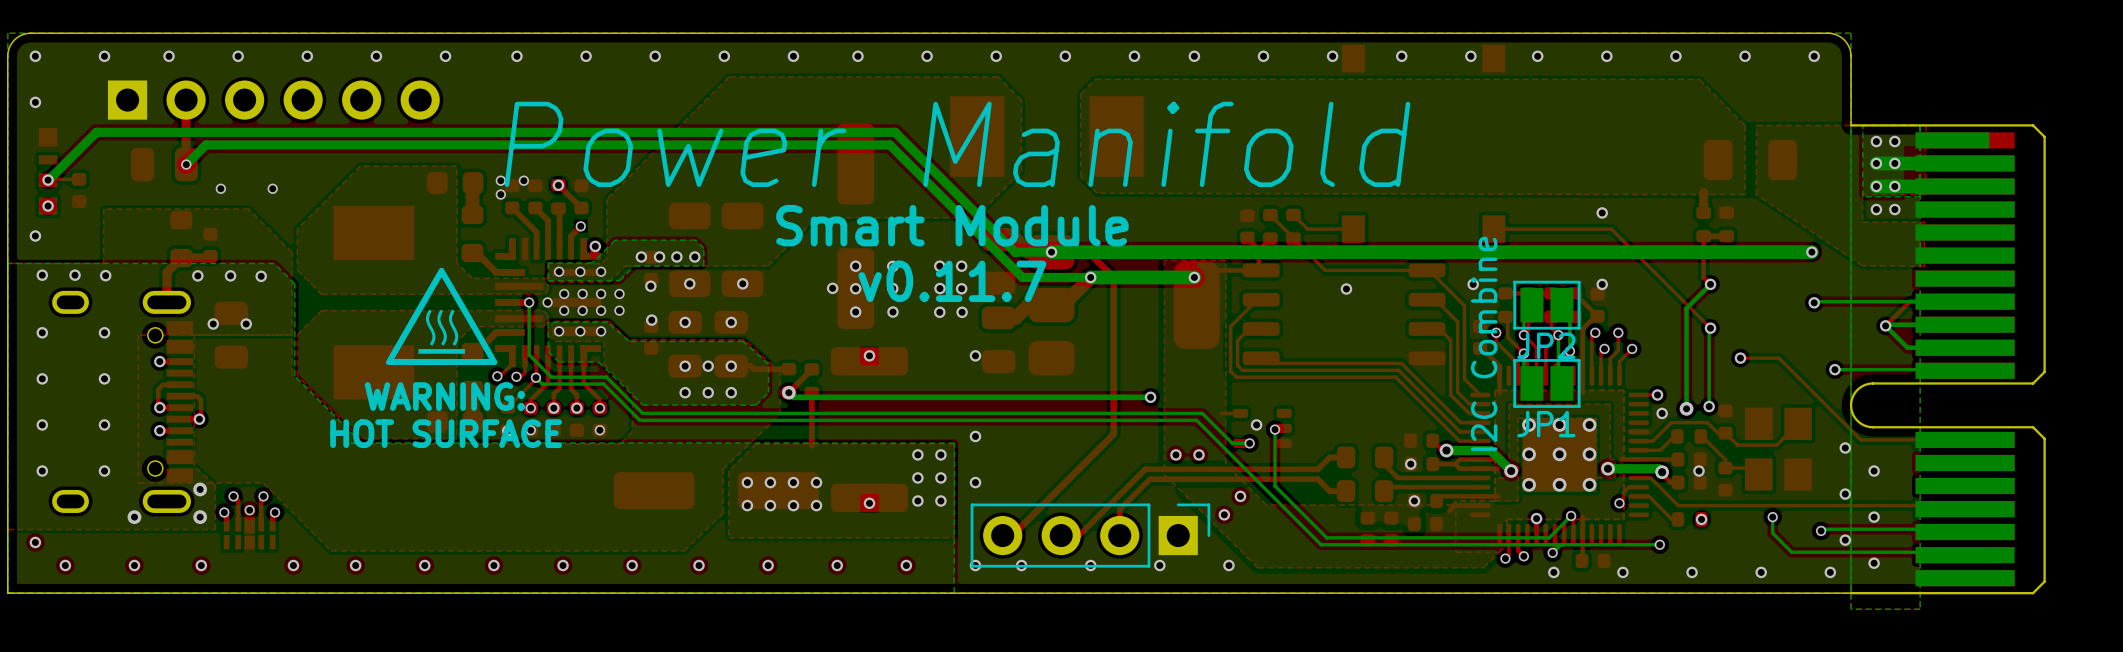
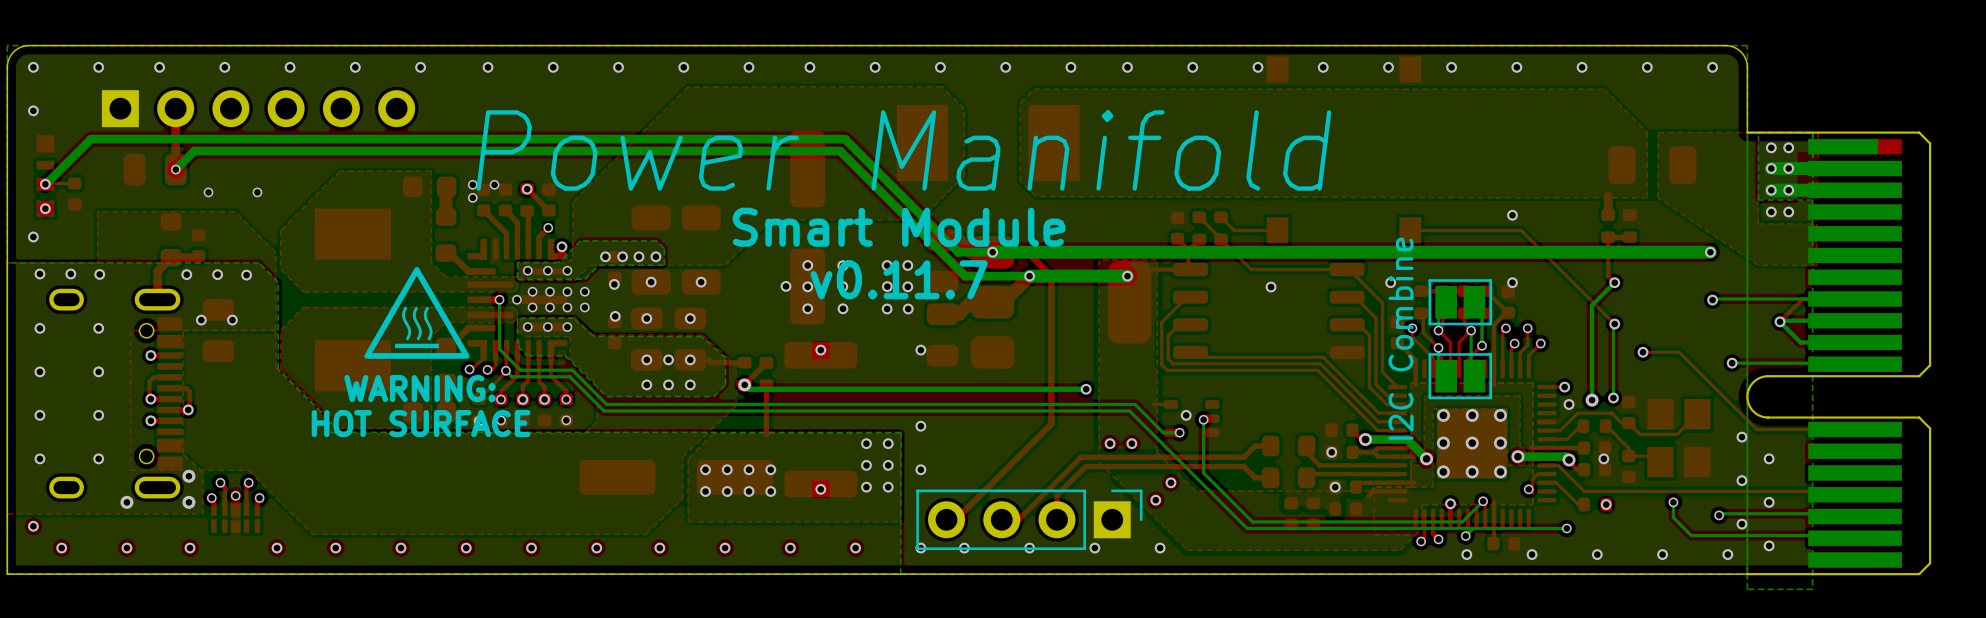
JP2 name: JP2 (1546, 345) -> none
JP1 name: JP1 (1546, 424) -> none

